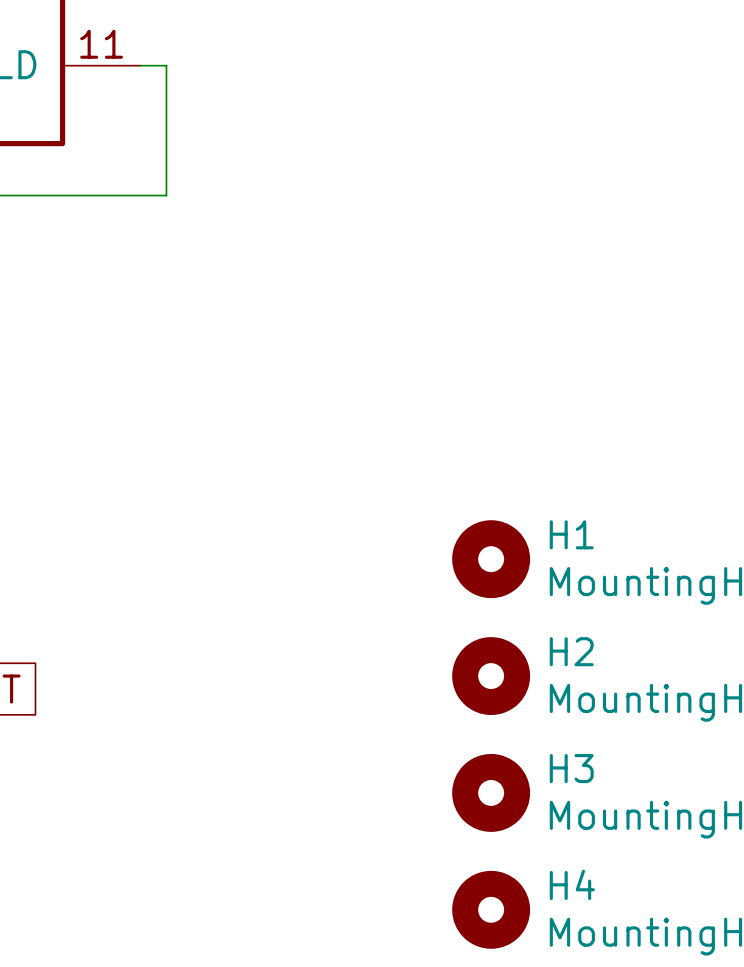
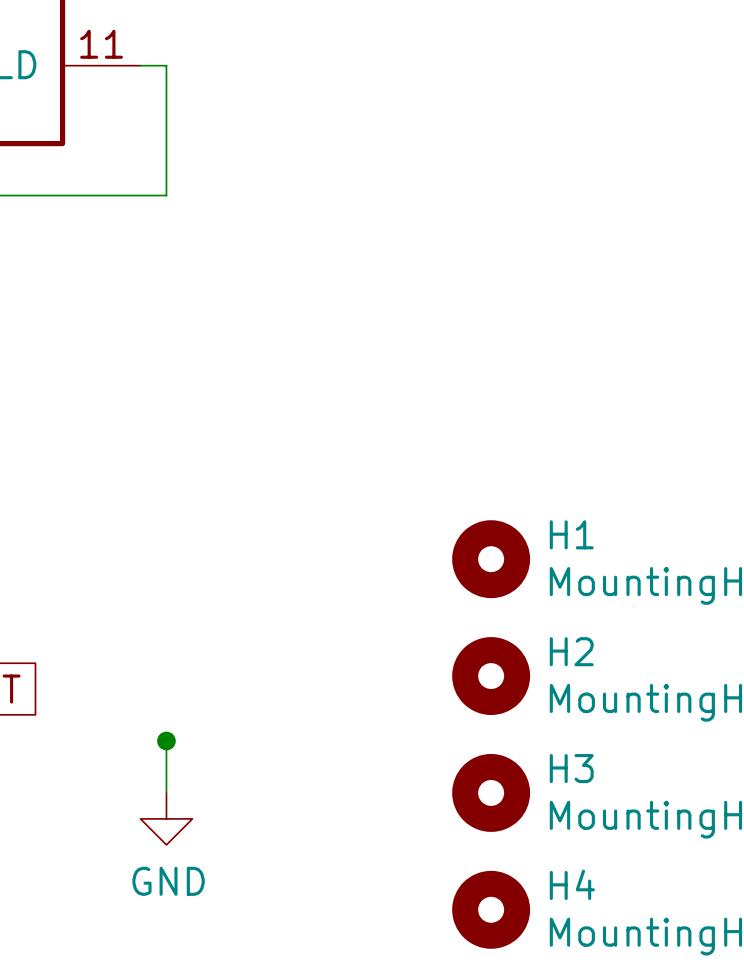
wire: none -> (166, 740) (166, 792)
junction: none -> (166, 740)
power symbol: none -> GND (166, 818)

